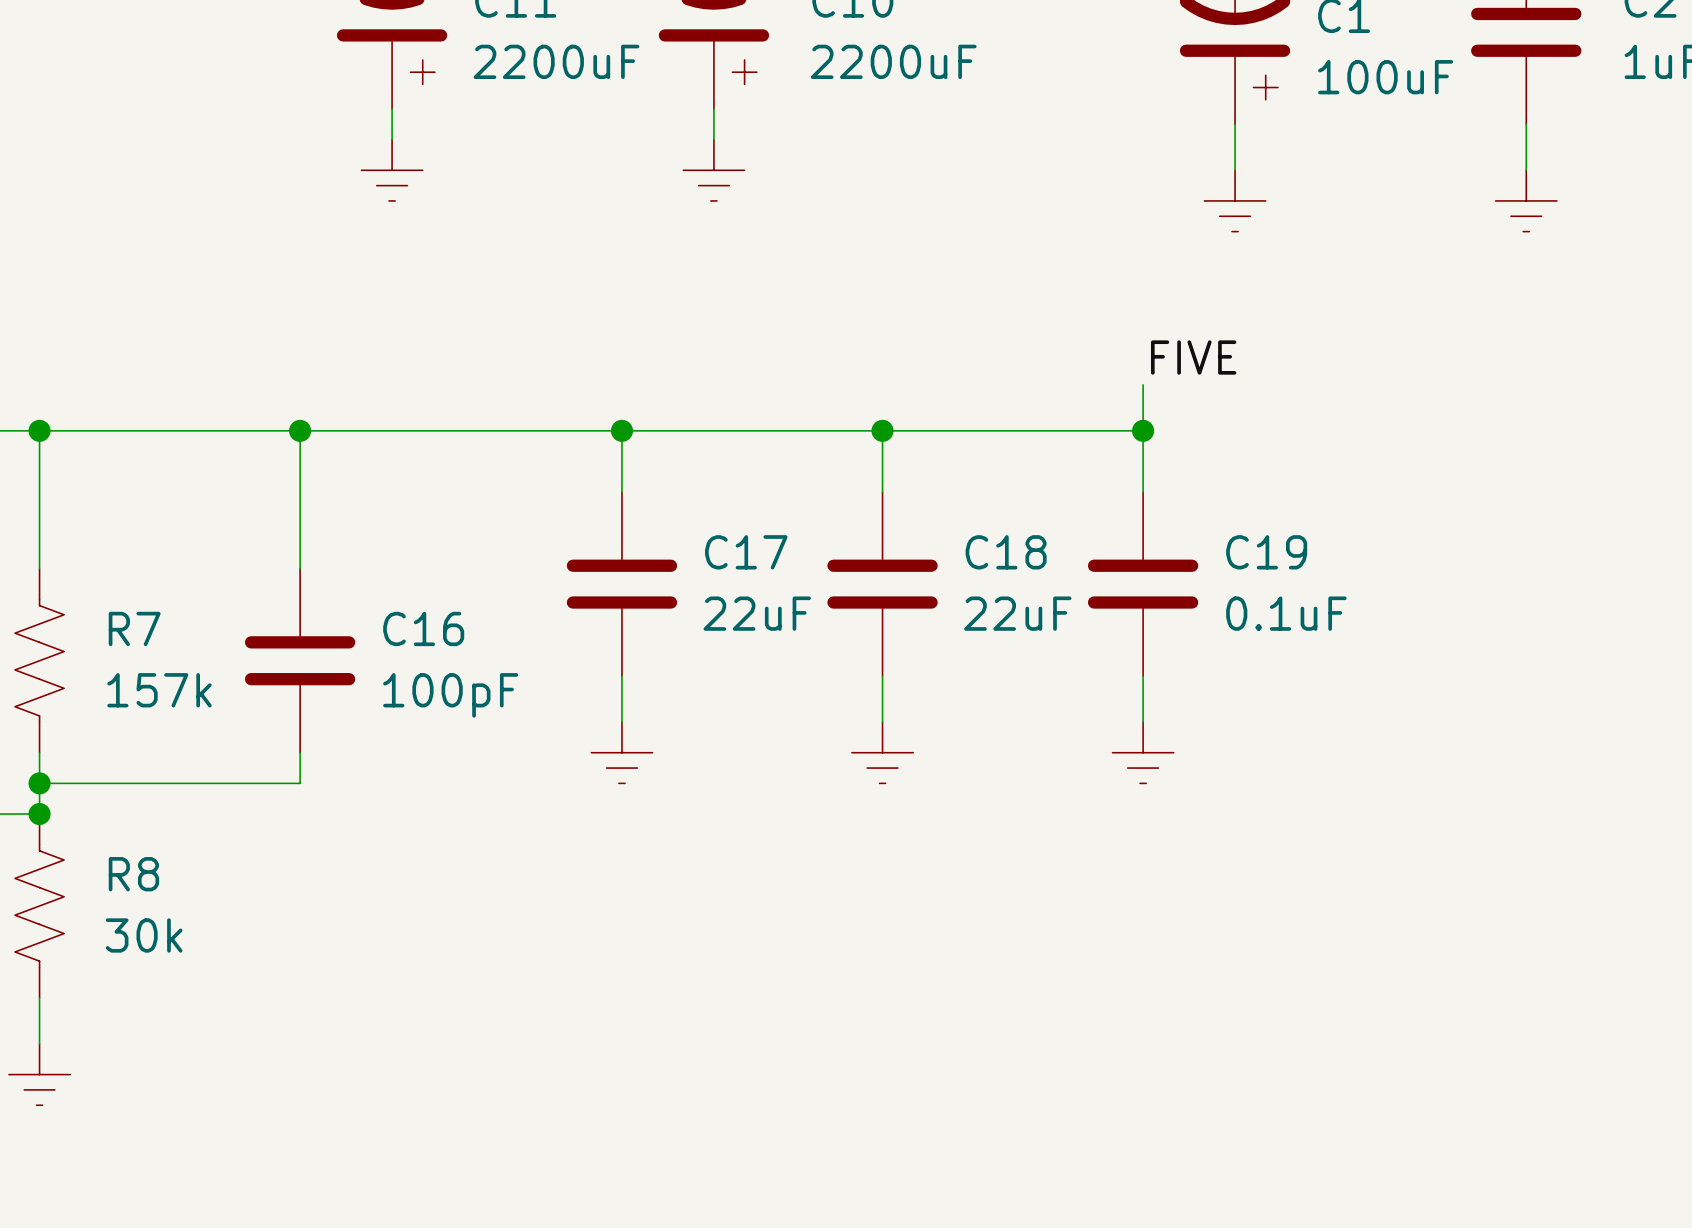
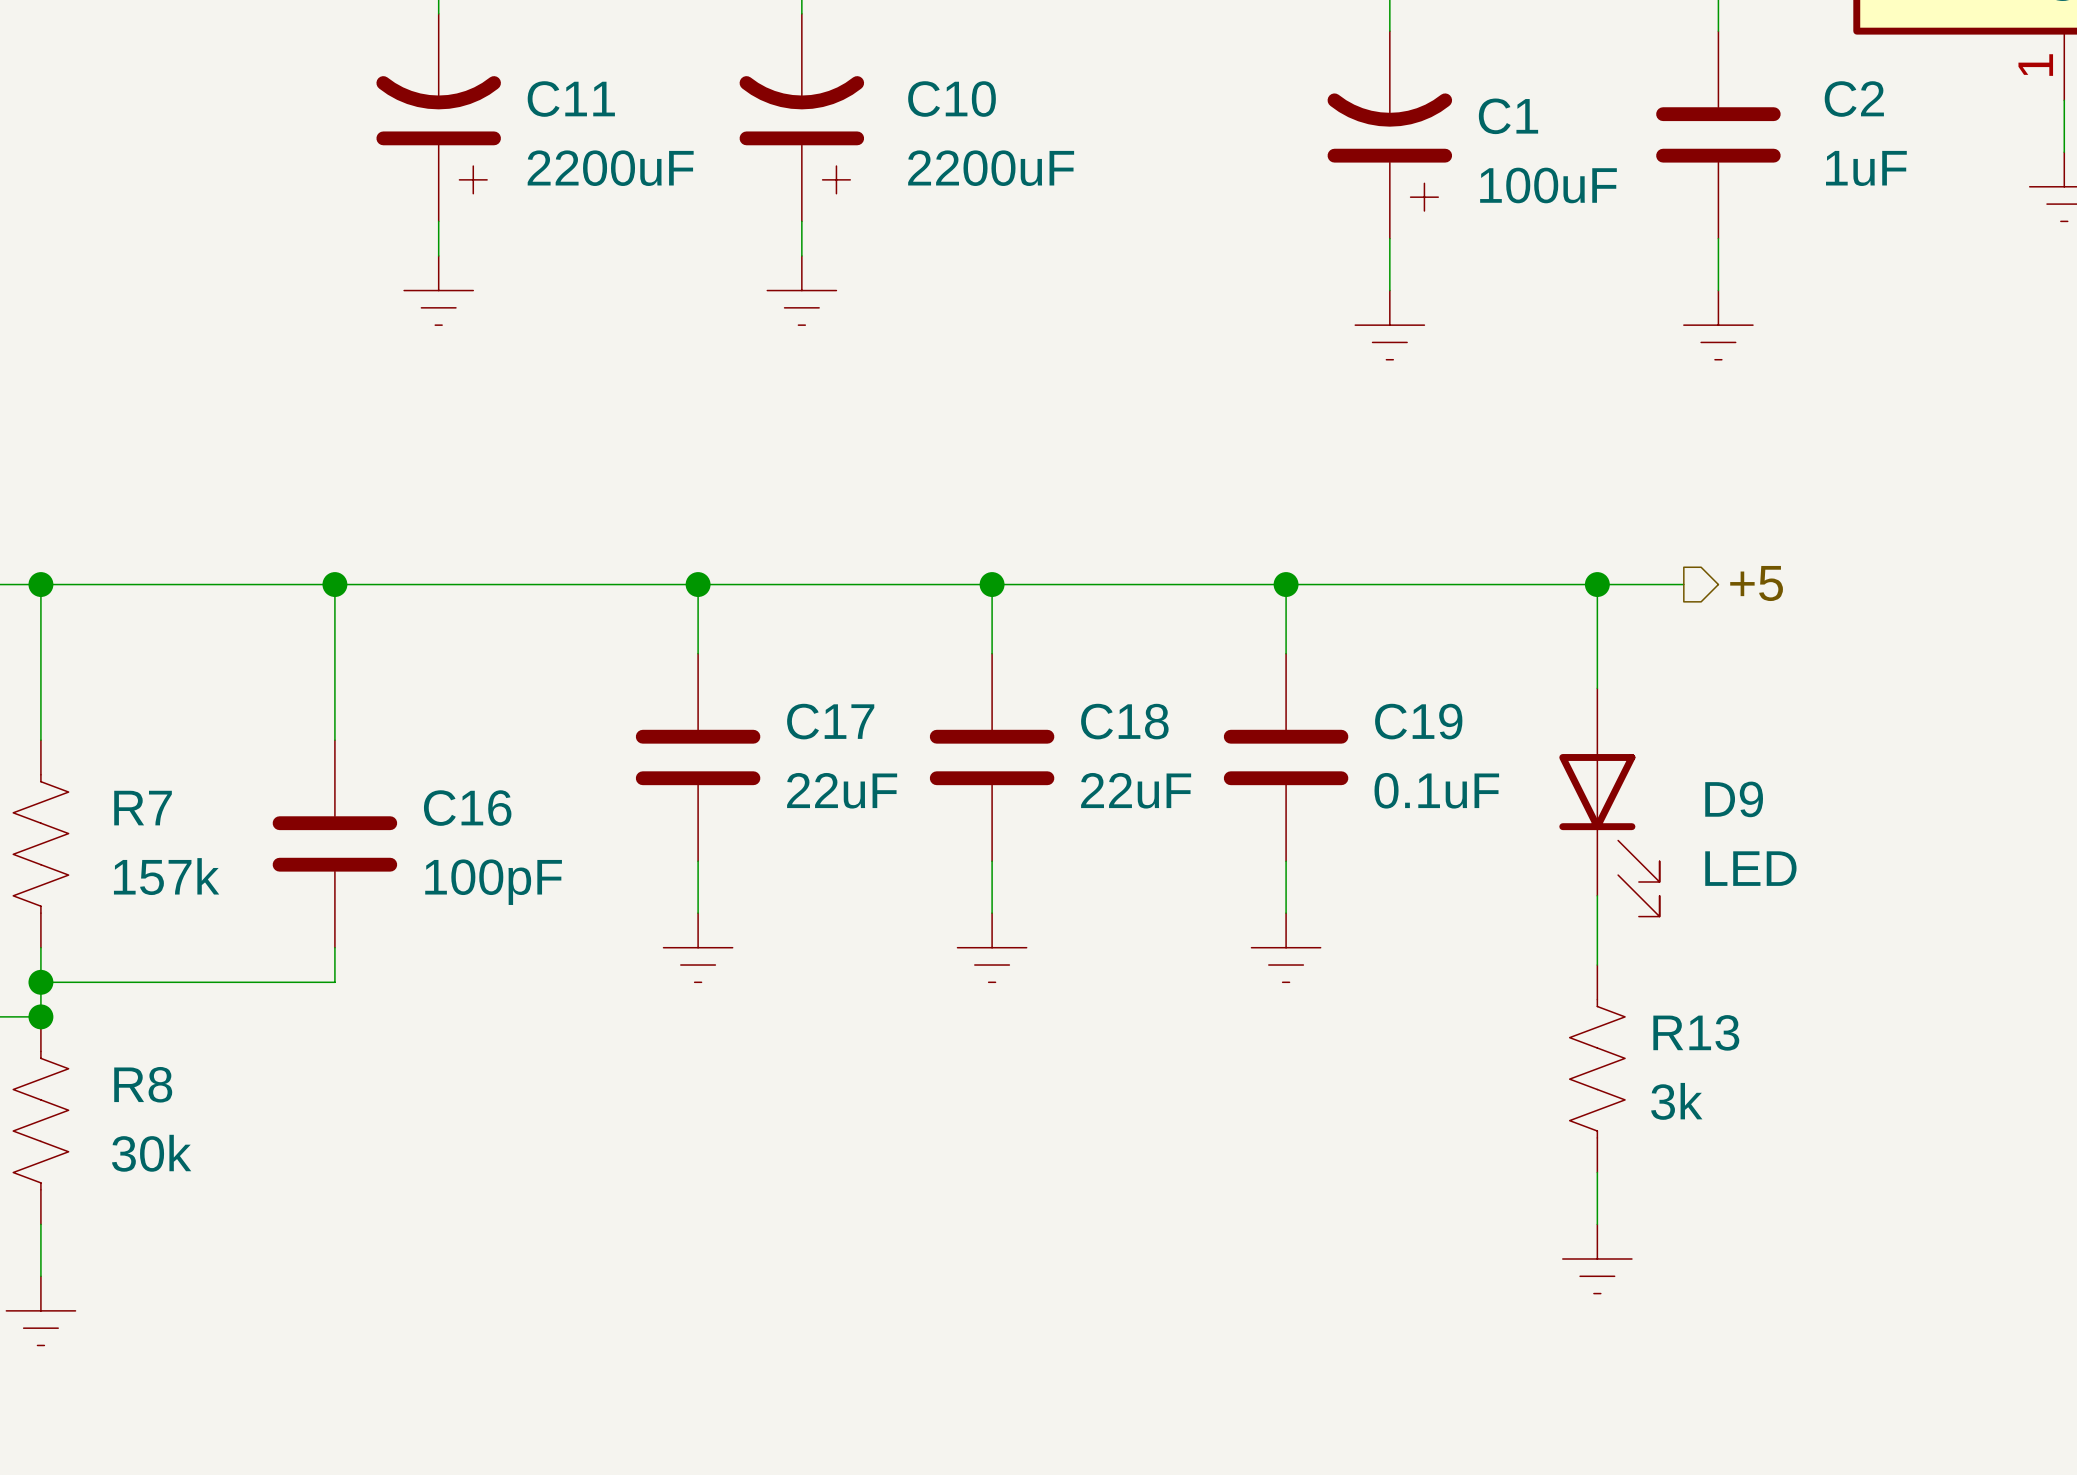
label: FIVE (1193, 357) -> none
wire: (1143, 384) (1143, 430) -> (1683, 584) (1286, 584)
hierarchical label: none -> +5 (1756, 583)
wire: none -> (1597, 584) (1597, 688)
junction: none -> (1597, 584)
D9: none -> LED (1609, 802)
wire: none -> (1597, 895) (1597, 965)
R13: none -> 3k (1597, 1068)
wire: none -> (1597, 1172) (1597, 1224)
power symbol: none -> (1597, 1259)

